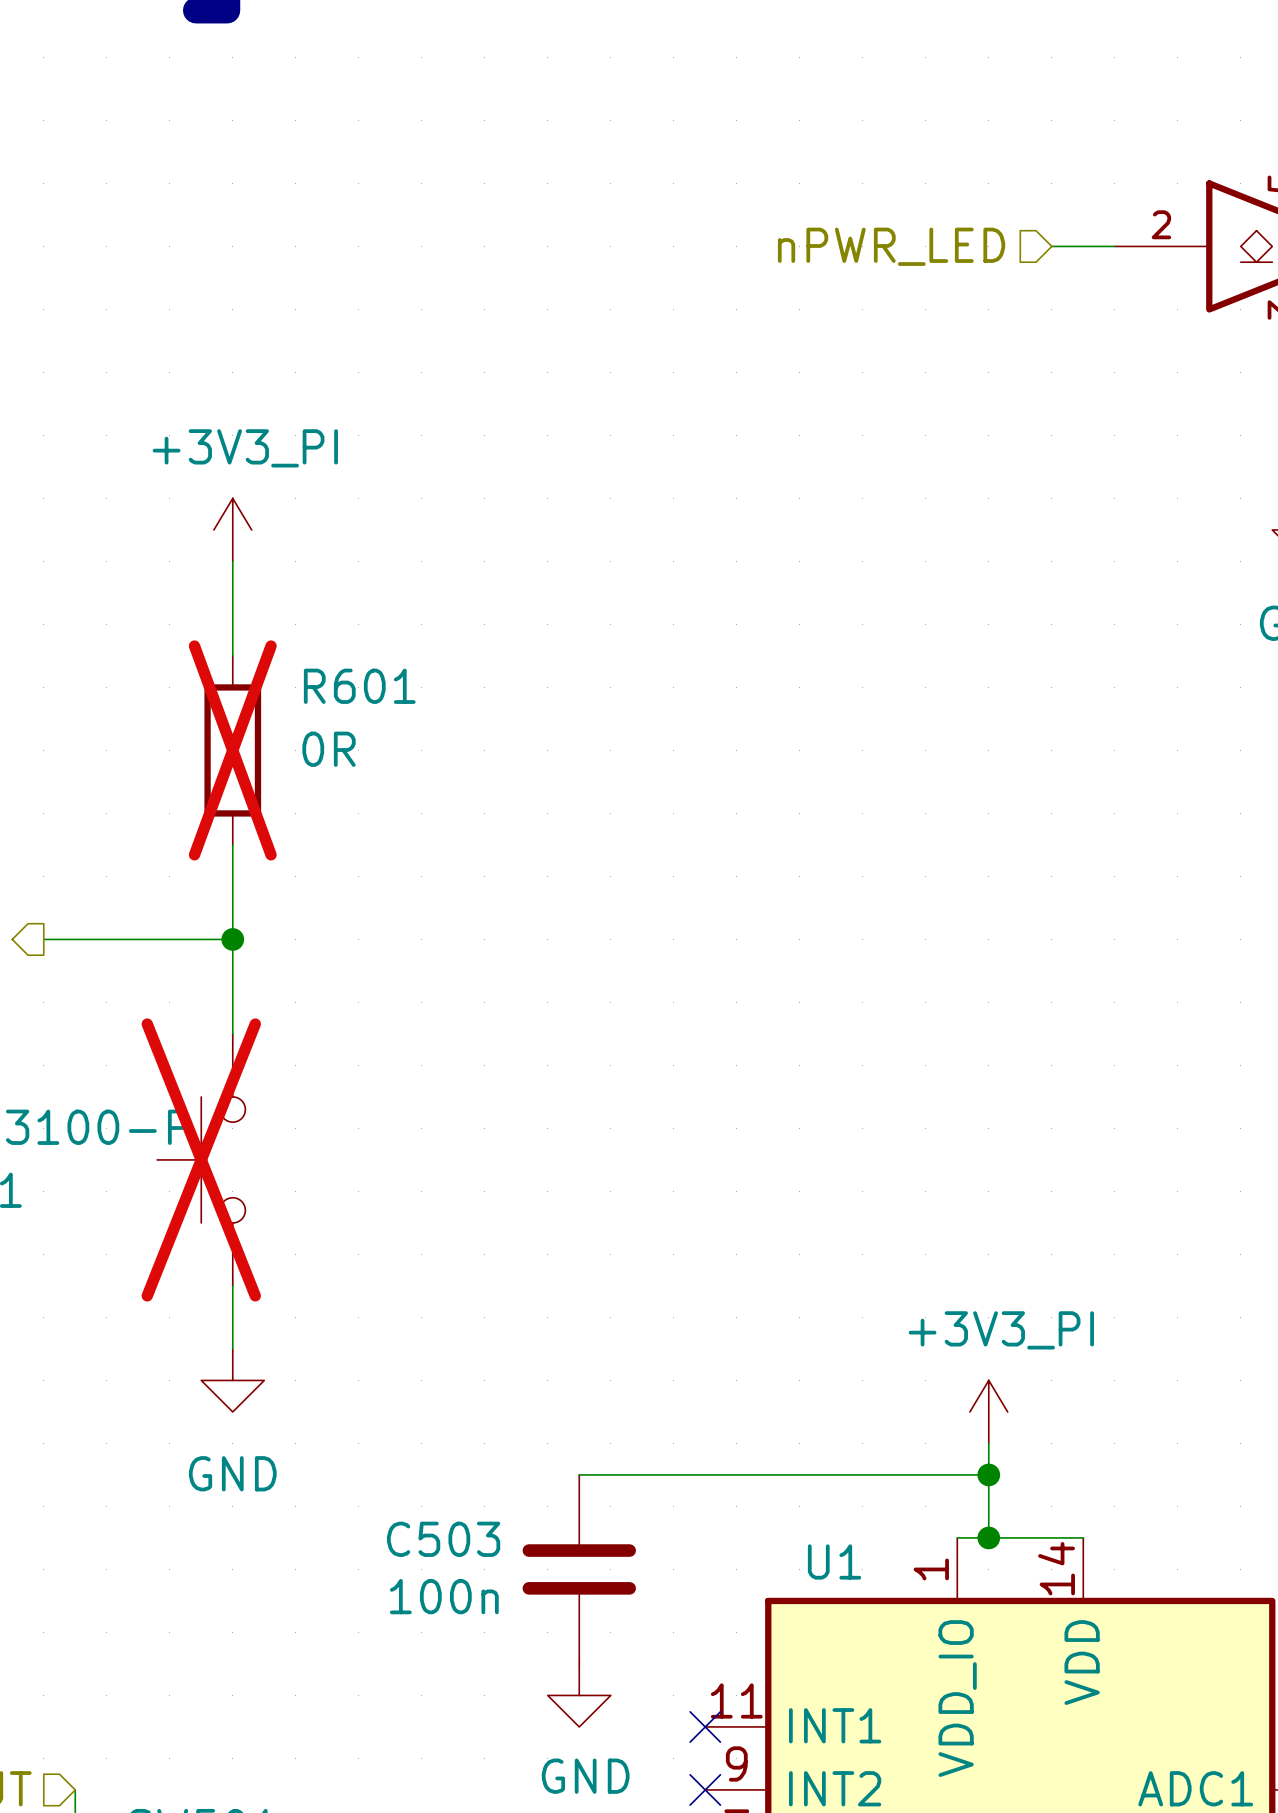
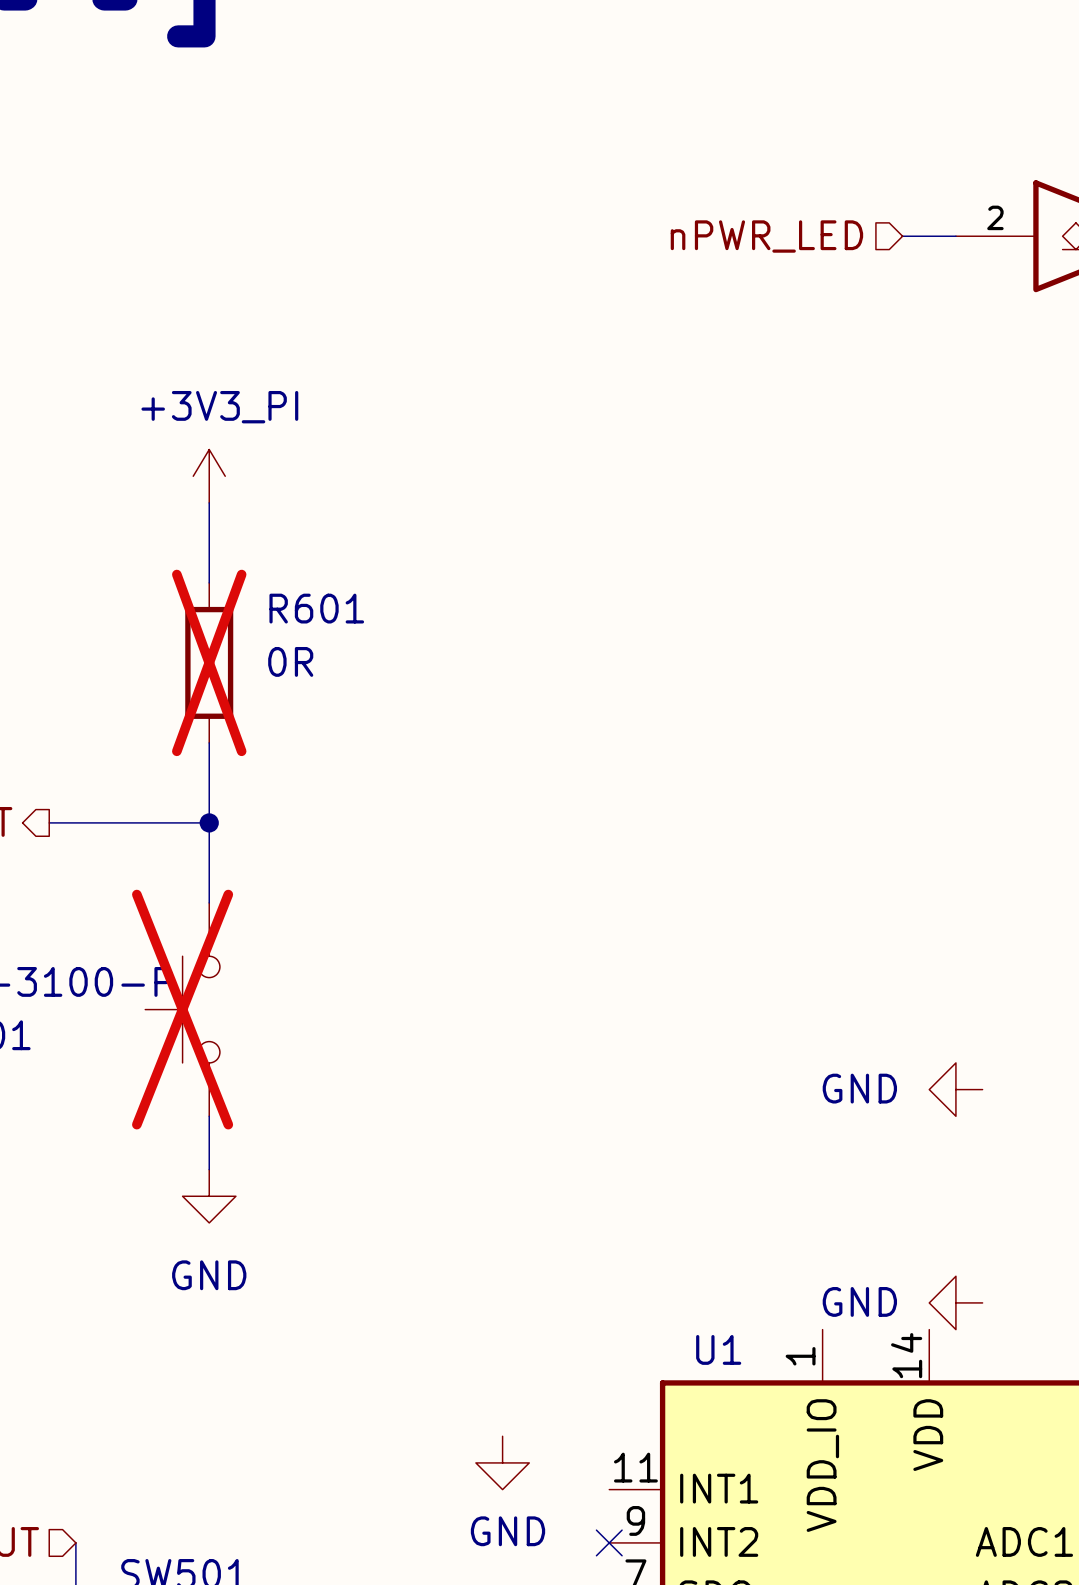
power symbol: none -> GND (955, 1089)
power symbol: +3V3_PI (988, 1411) -> none
wire: (988, 1443) (988, 1537) -> none
wire: (579, 1474) (988, 1474) -> none
junction: (988, 1474) -> none
power symbol: none -> GND (955, 1302)
wire: (957, 1537) (1083, 1537) -> none
junction: (988, 1537) -> none
C503: 100n (579, 1569) -> none
no-connect mark: (705, 1726) -> none

